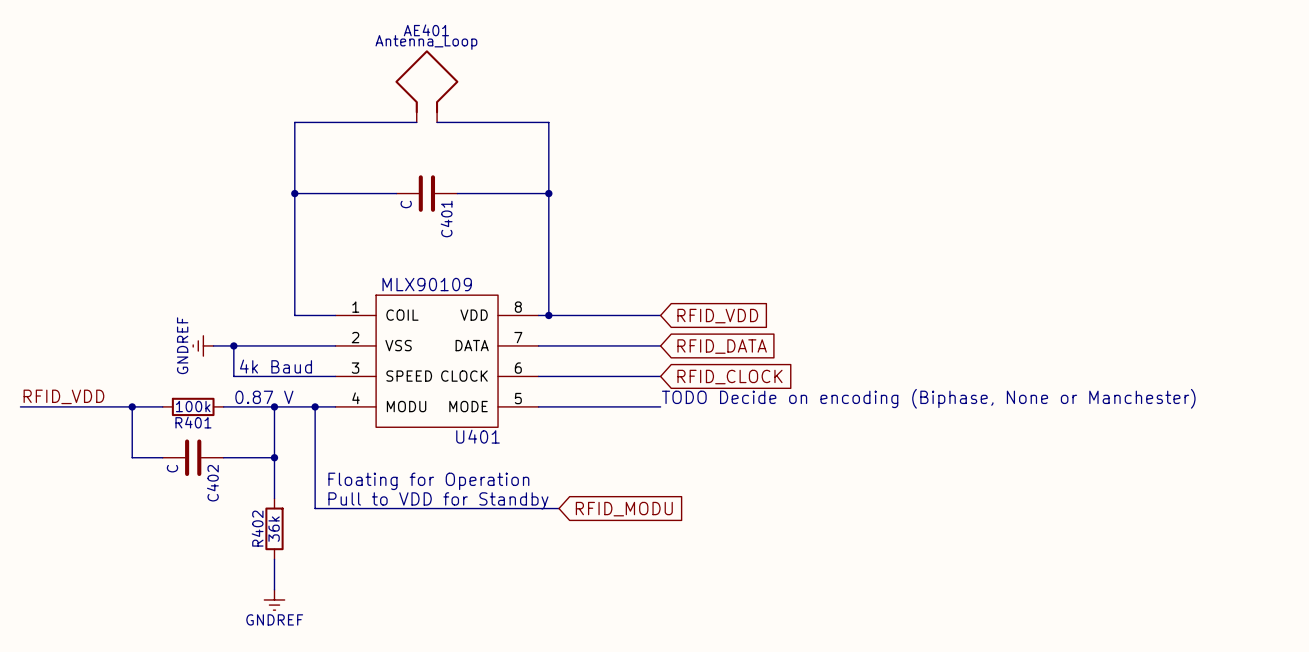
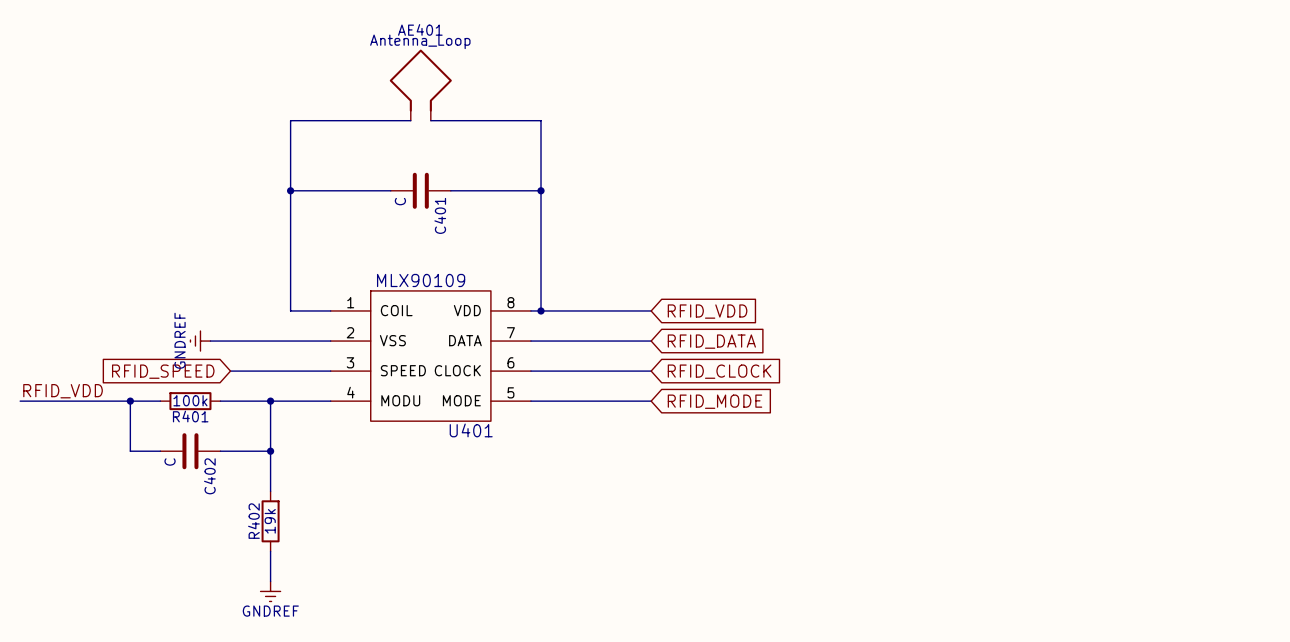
wire: (233, 345) (233, 376) -> none
junction: (233, 345) -> none
text: 4k Baud (276, 366) -> none
global label: none -> RFID_SPEED (163, 371)
text: 0.87 V (264, 397) -> none
text: TODO Decide on encoding (Biphase, None or Manchester) (928, 398) -> none
wire: (315, 406) (315, 508) (558, 508) -> none
junction: (315, 406) -> none
global label: none -> RFID_MODE (715, 401)
text: Floating for Operation (428, 481) -> none
text: Pull to VDD for Standby (438, 500) -> none
global label: RFID_MODU (624, 509) -> none
R402 value: 36k (274, 529) -> 19k (270, 521)

